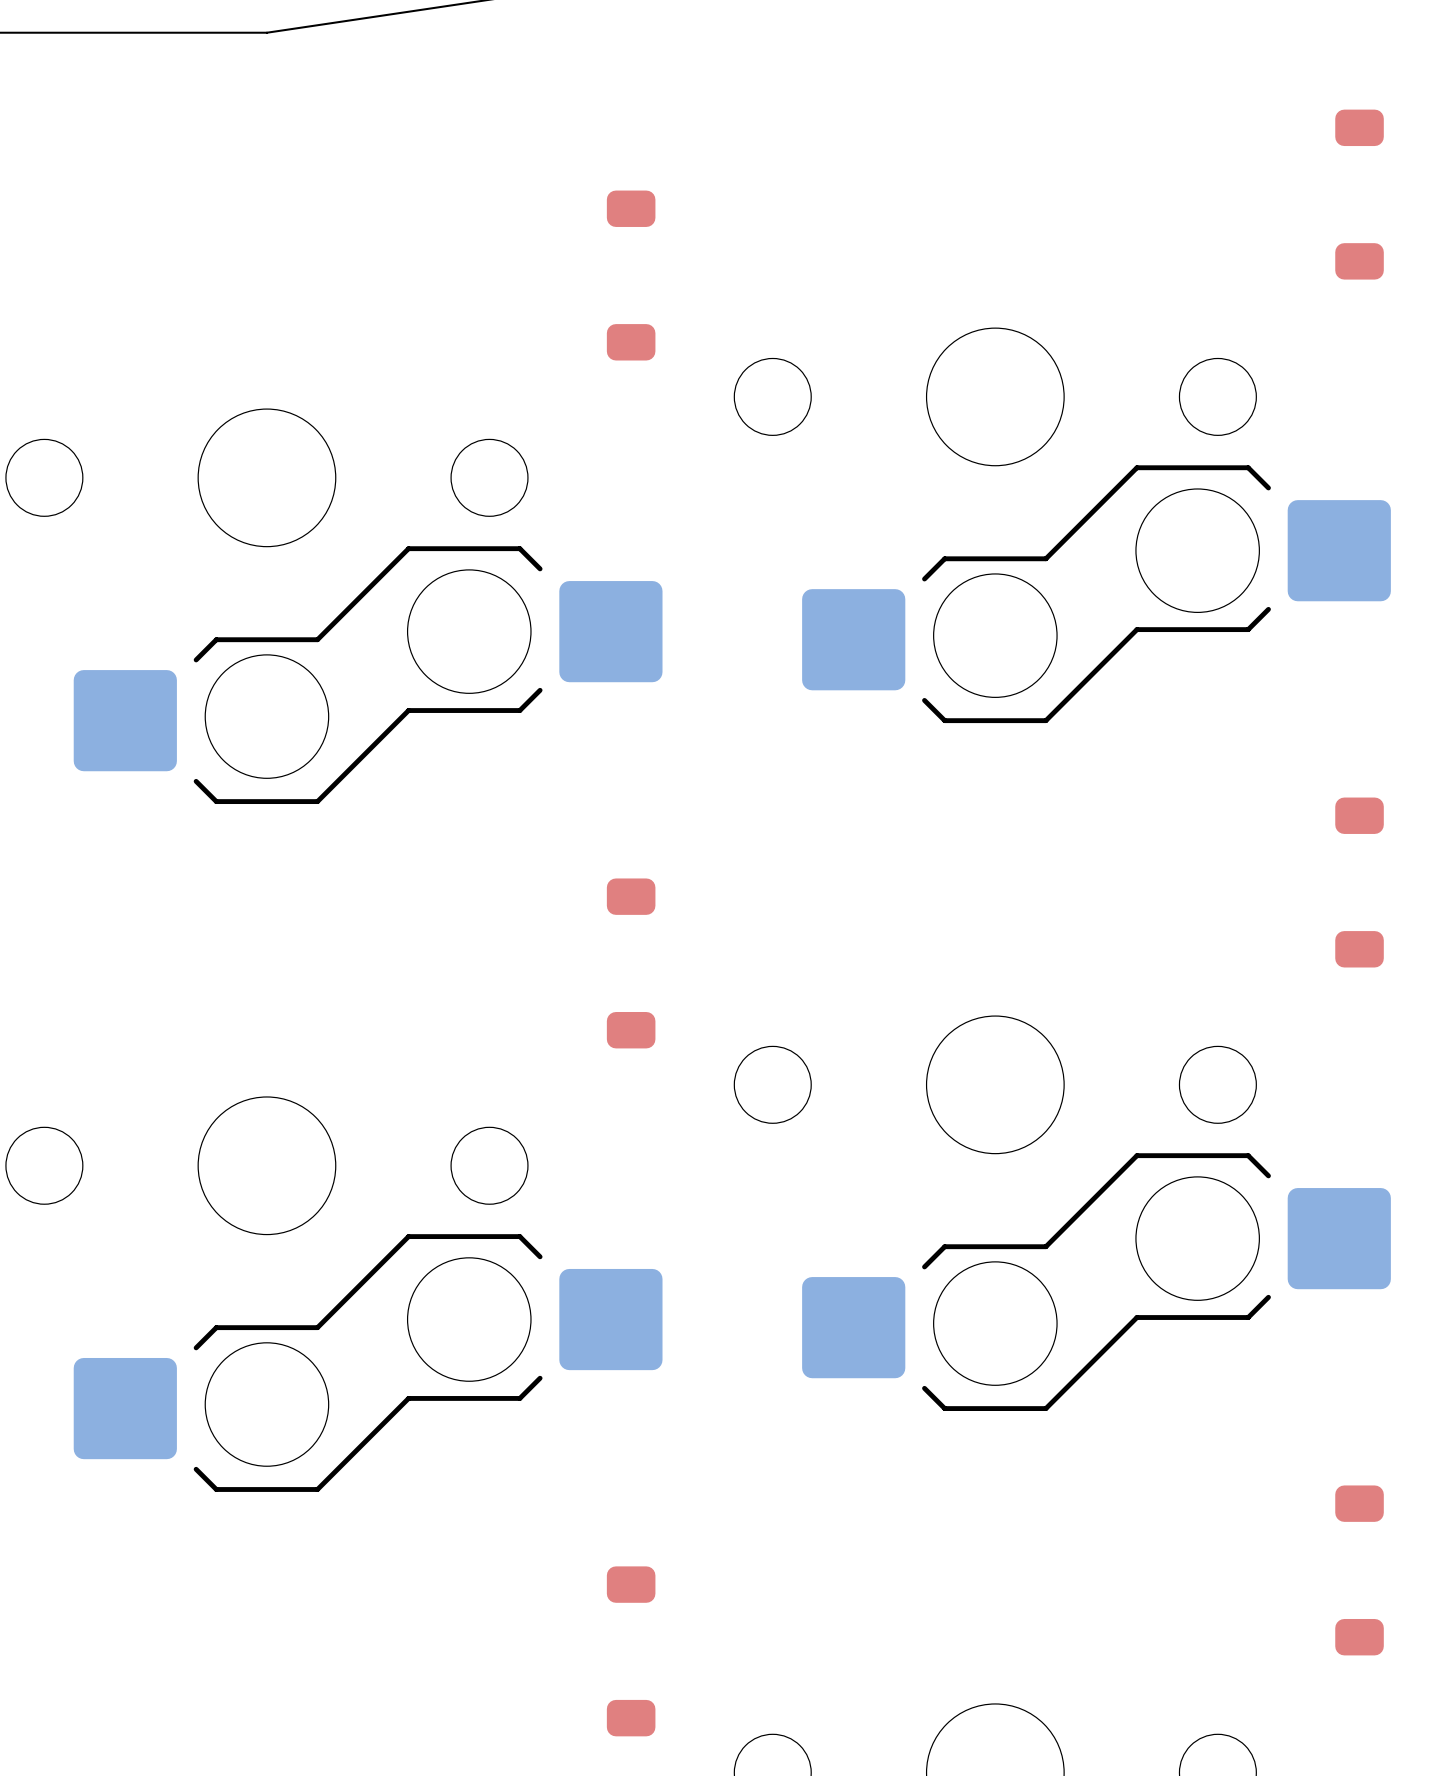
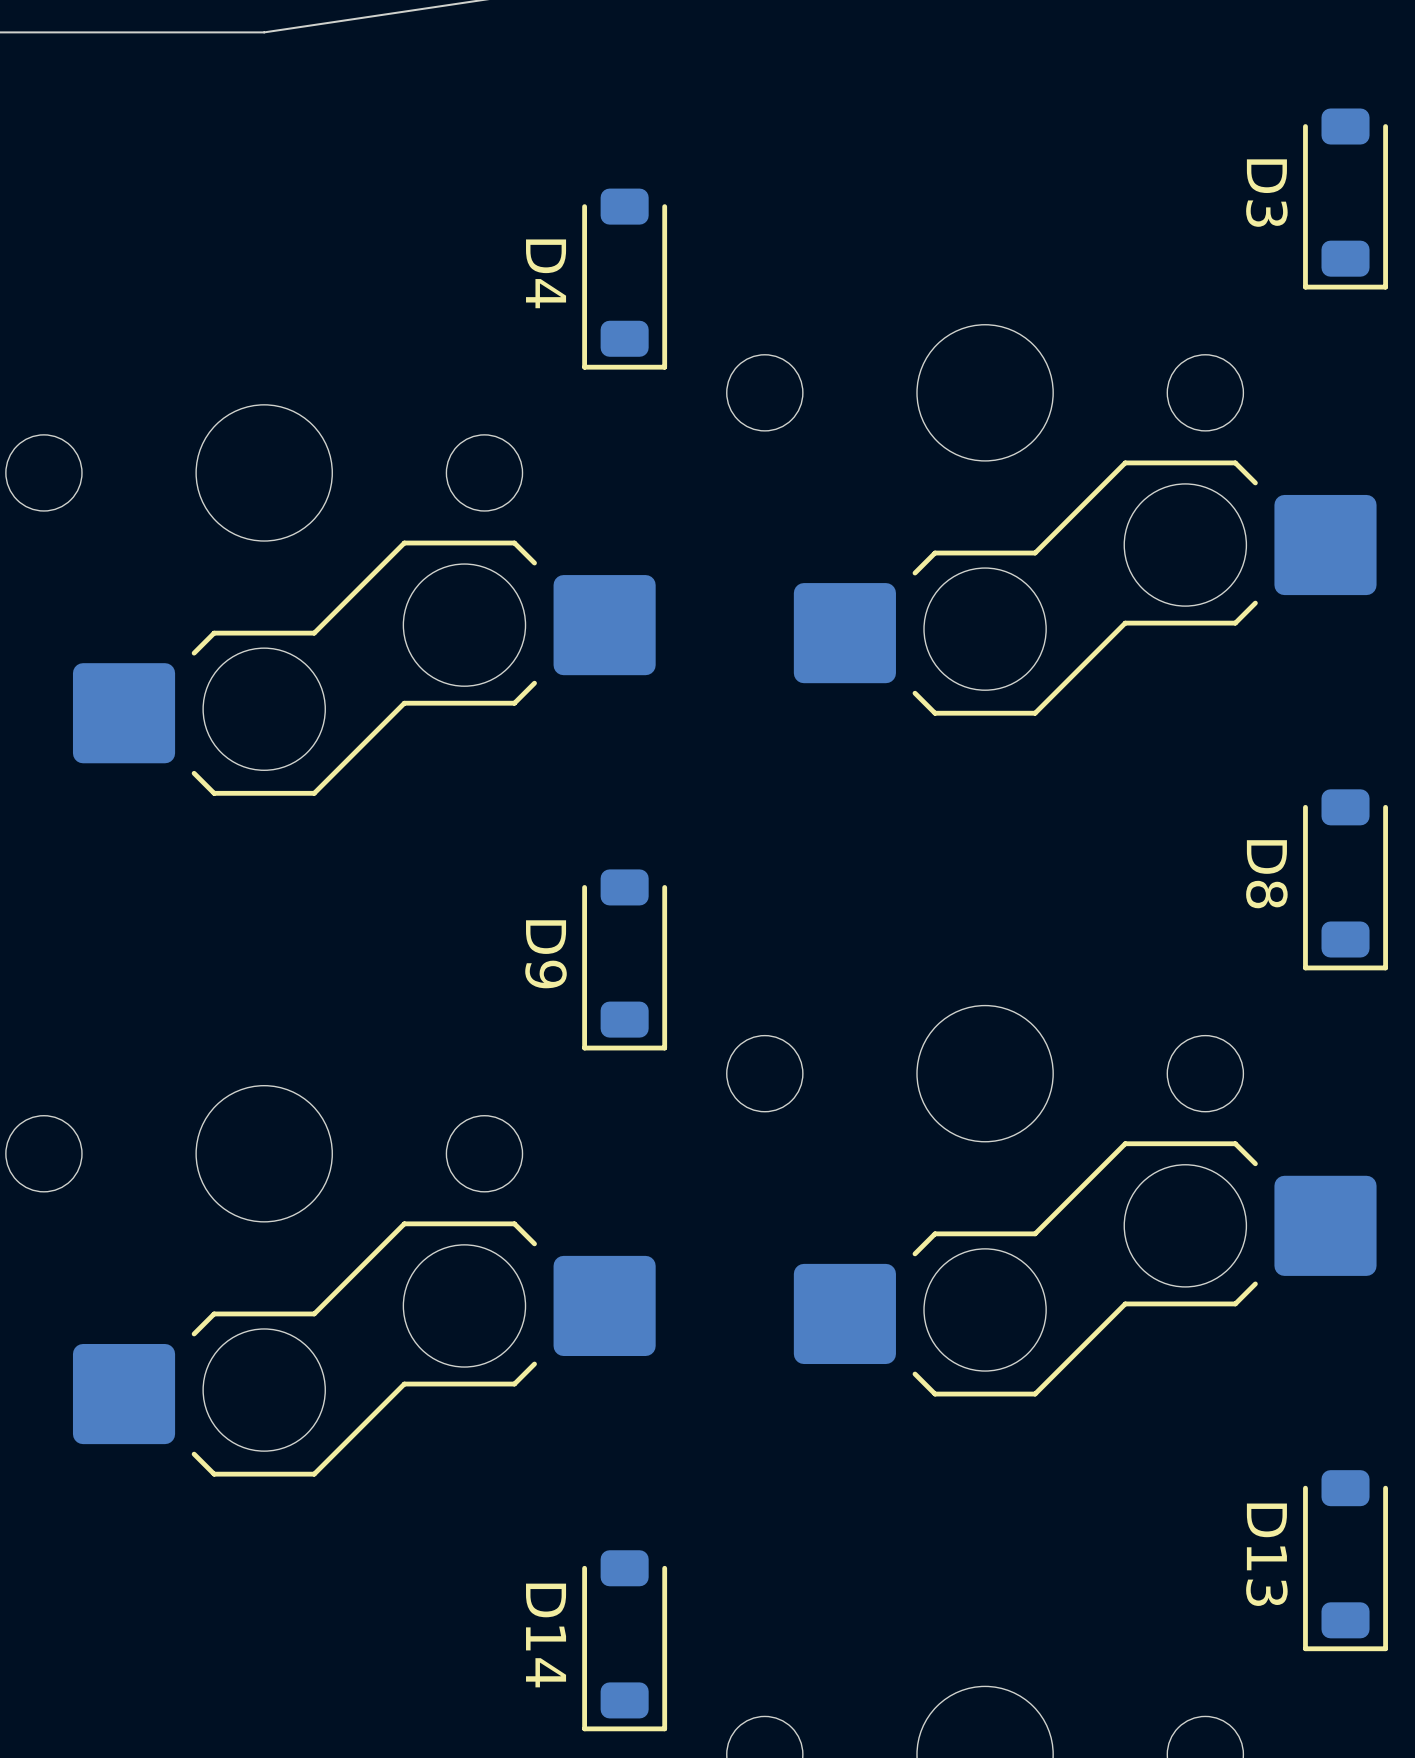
D3 side: top (1359, 194) -> bottom (1345, 198)
D4 side: top (631, 275) -> bottom (624, 279)
D8 side: top (1359, 882) -> bottom (1345, 879)
D9 side: top (631, 963) -> bottom (624, 959)
D13 side: top (1359, 1570) -> bottom (1345, 1560)
D14 side: top (631, 1651) -> bottom (624, 1640)

